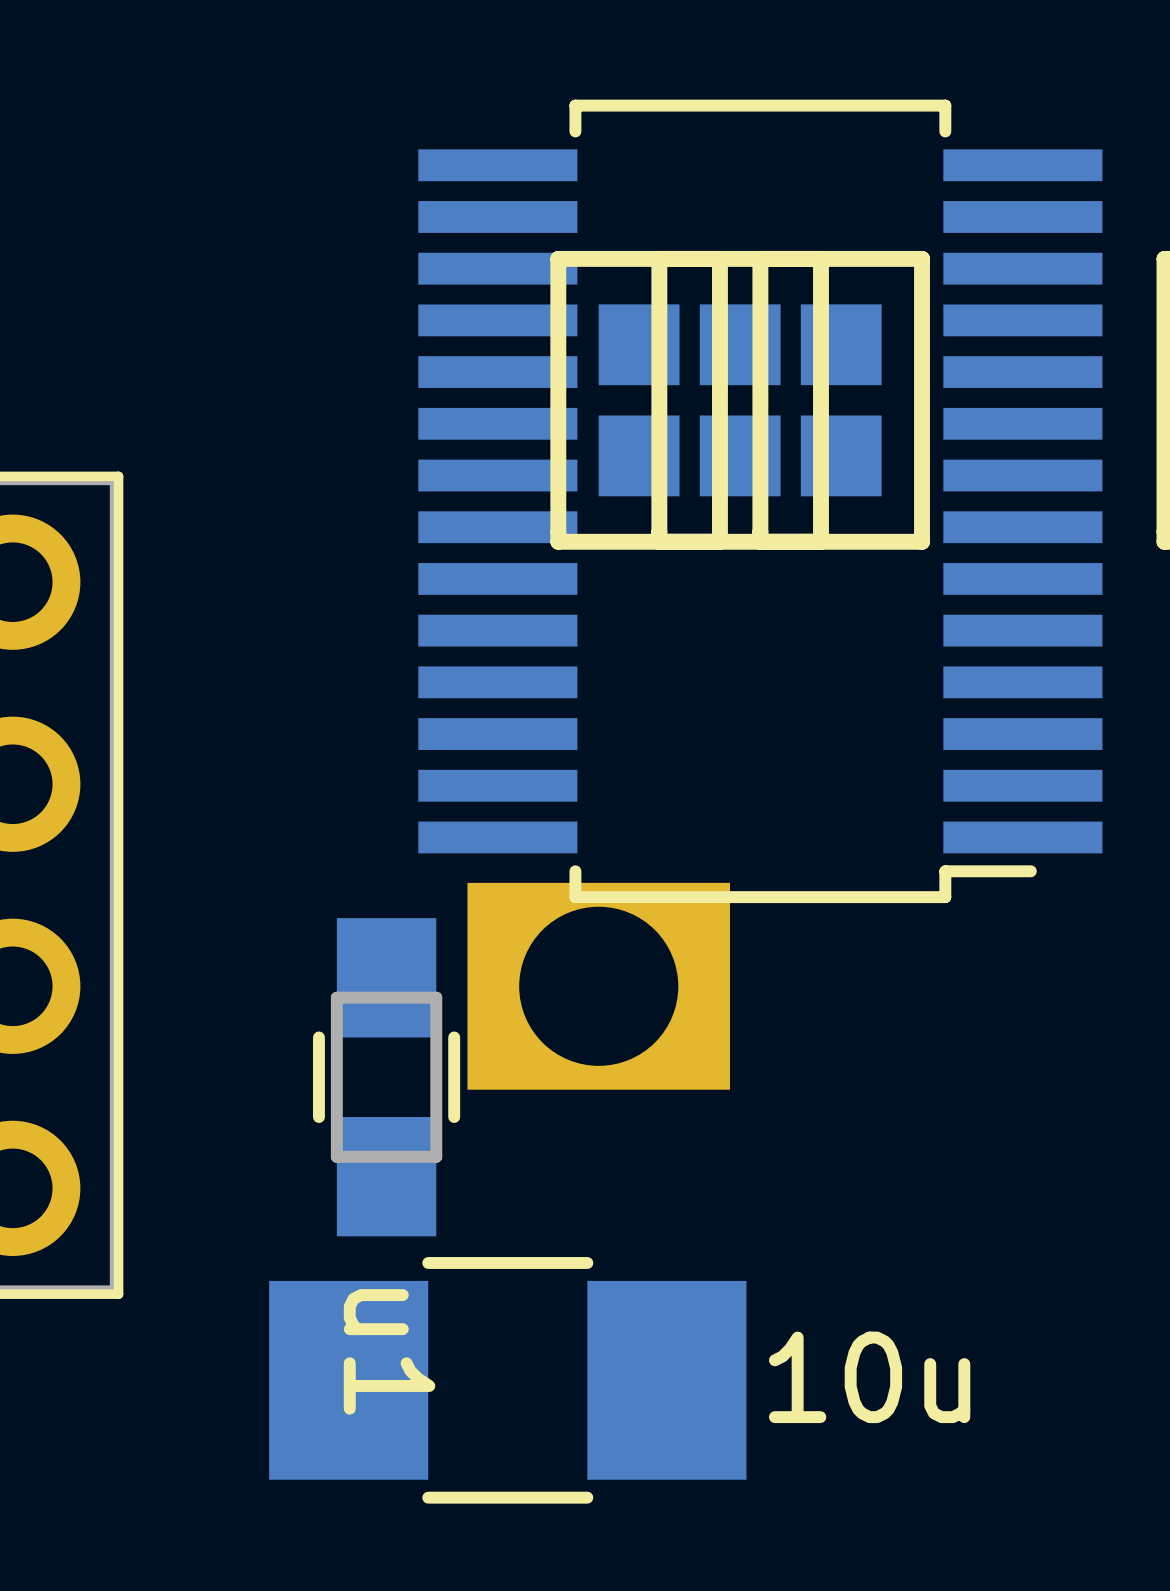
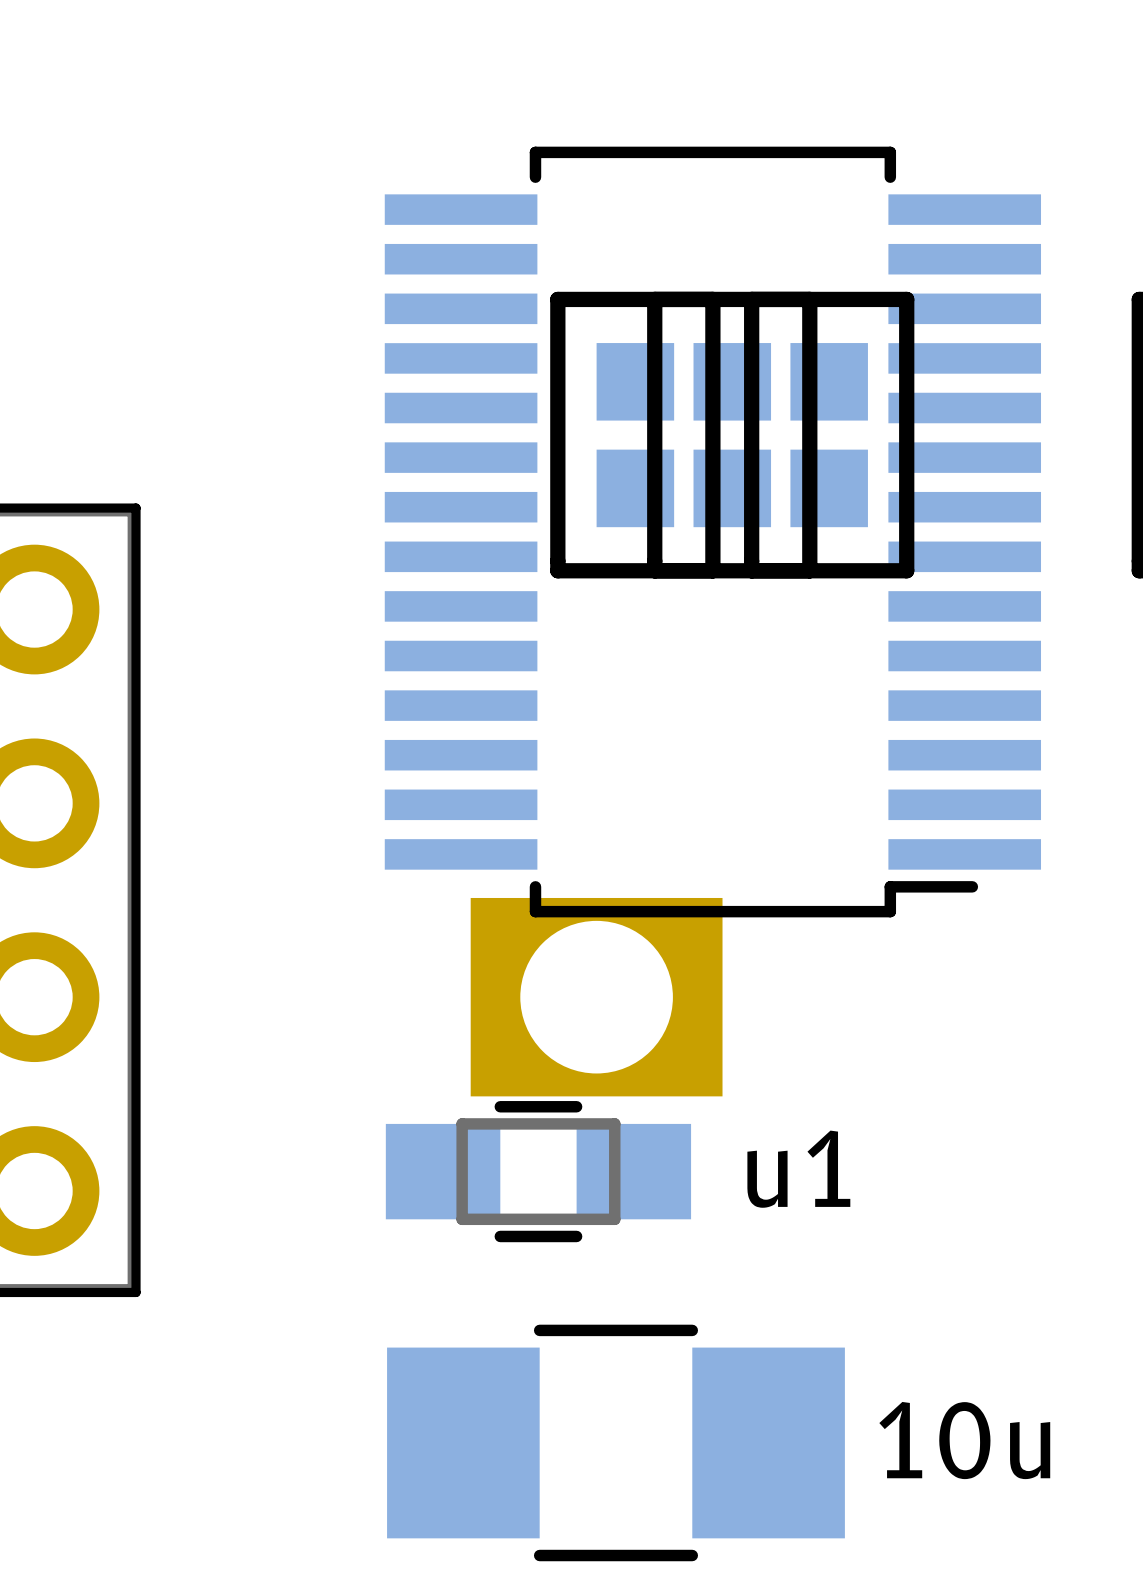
part position: (760, 501) -> (712, 532)
part rotation: 0° (386, 1077) -> 90° clockwise (538, 1171)
part value position: u1 (389, 1351) -> u1 (798, 1169)
part position: (507, 1380) -> (615, 1442)

